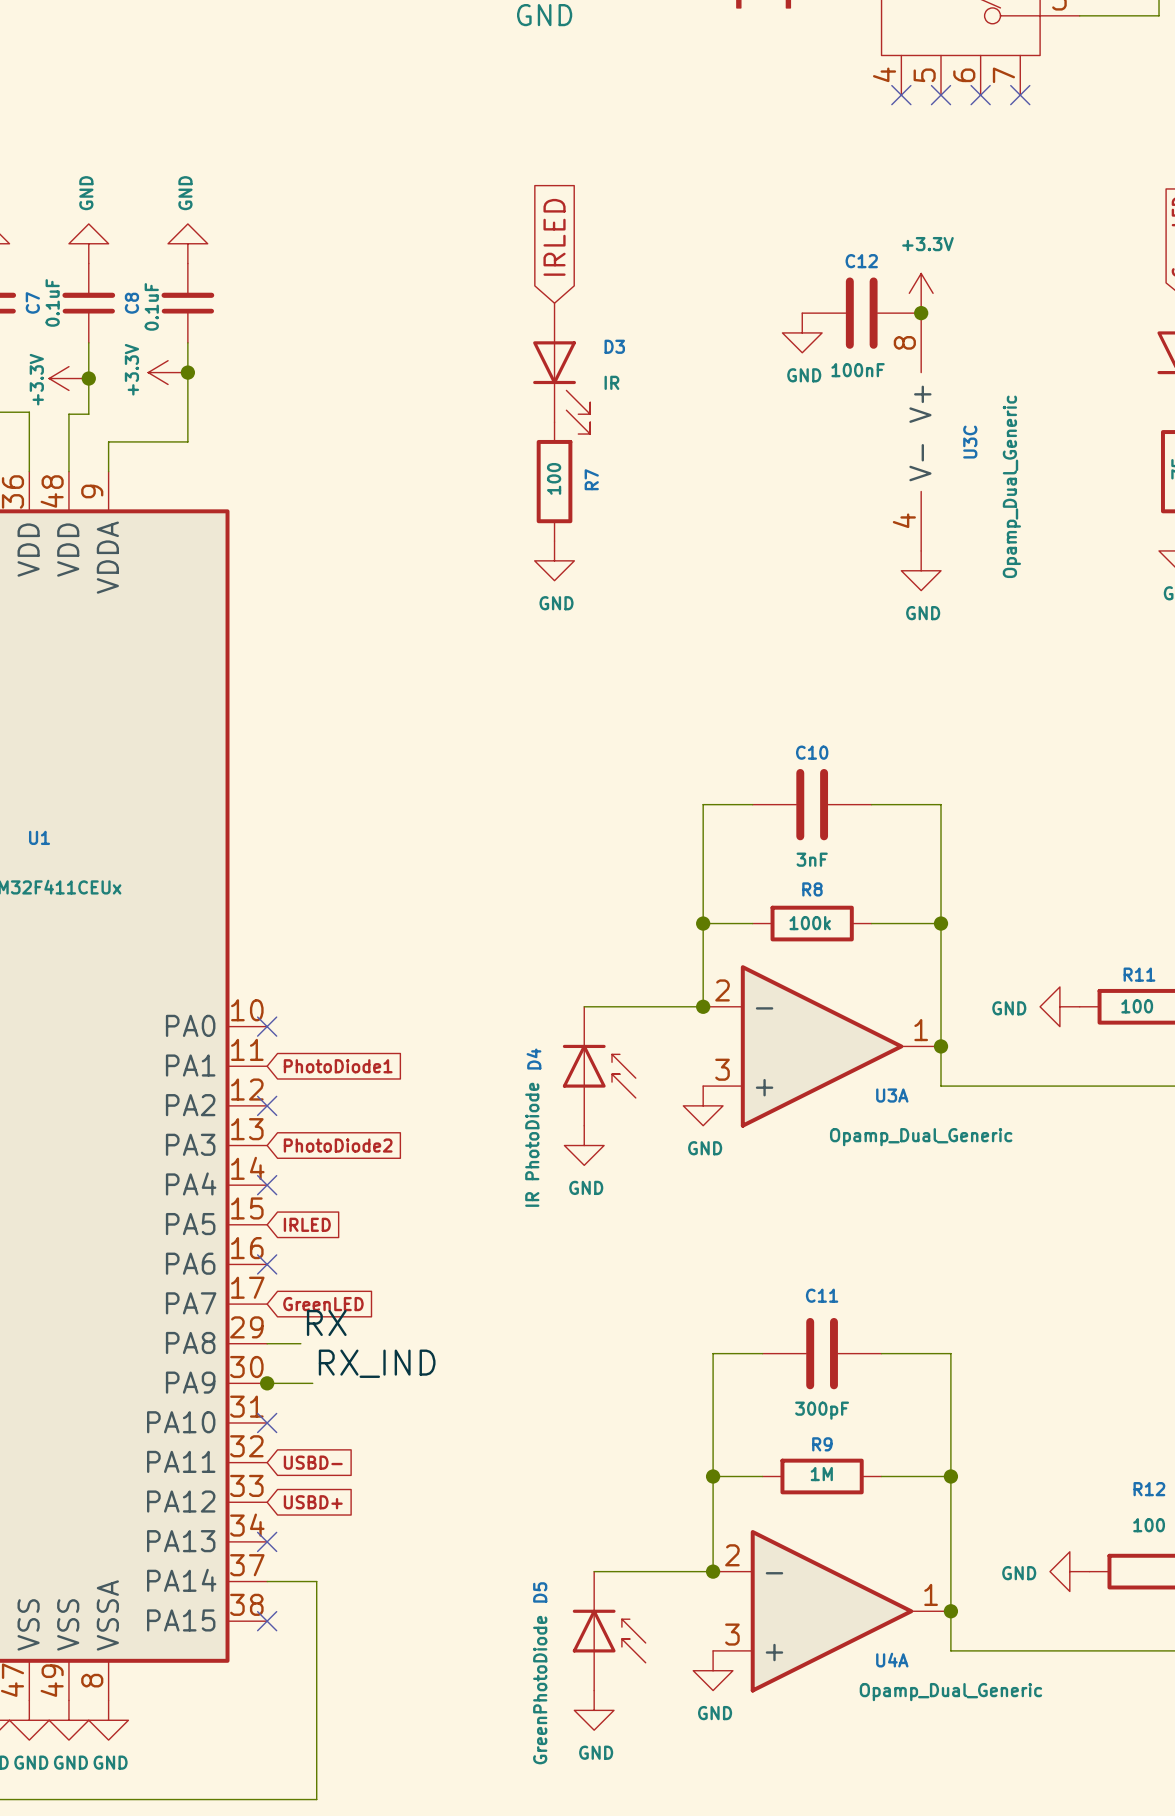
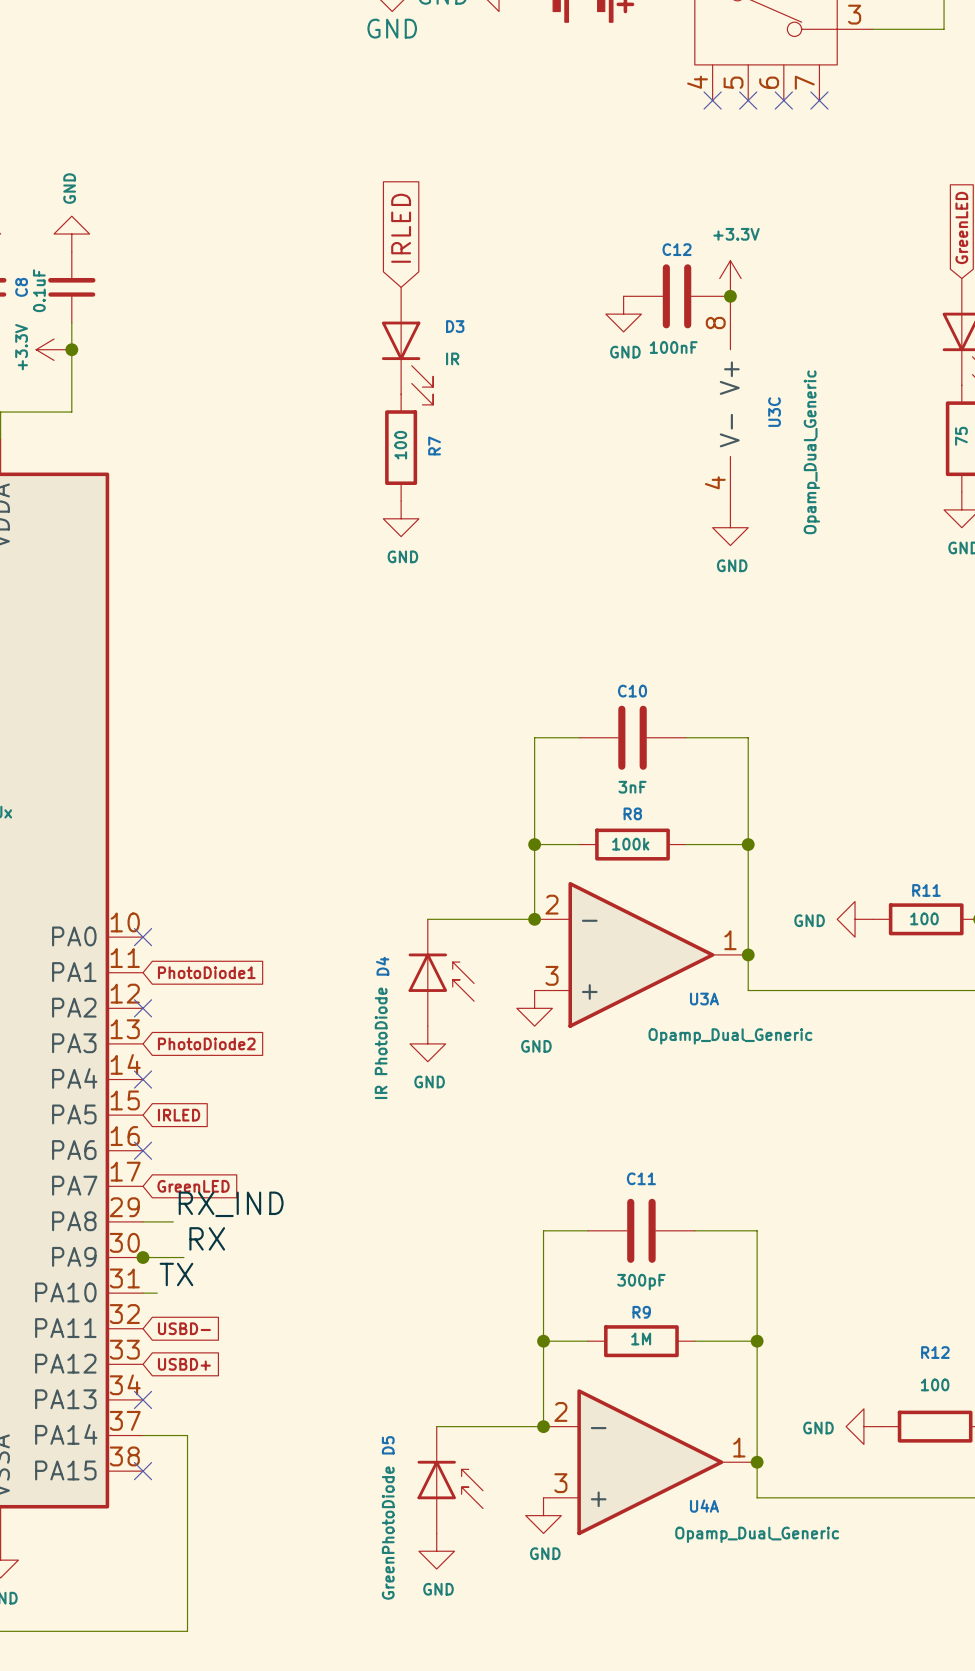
label: RX (326, 1322) -> RX_IND (231, 1204)
label: RX_IND (377, 1363) -> RX (207, 1238)
label: none -> TX (176, 1274)
wire: none -> (143, 1293) (157, 1293)
no-connect mark: (267, 1422) -> none

